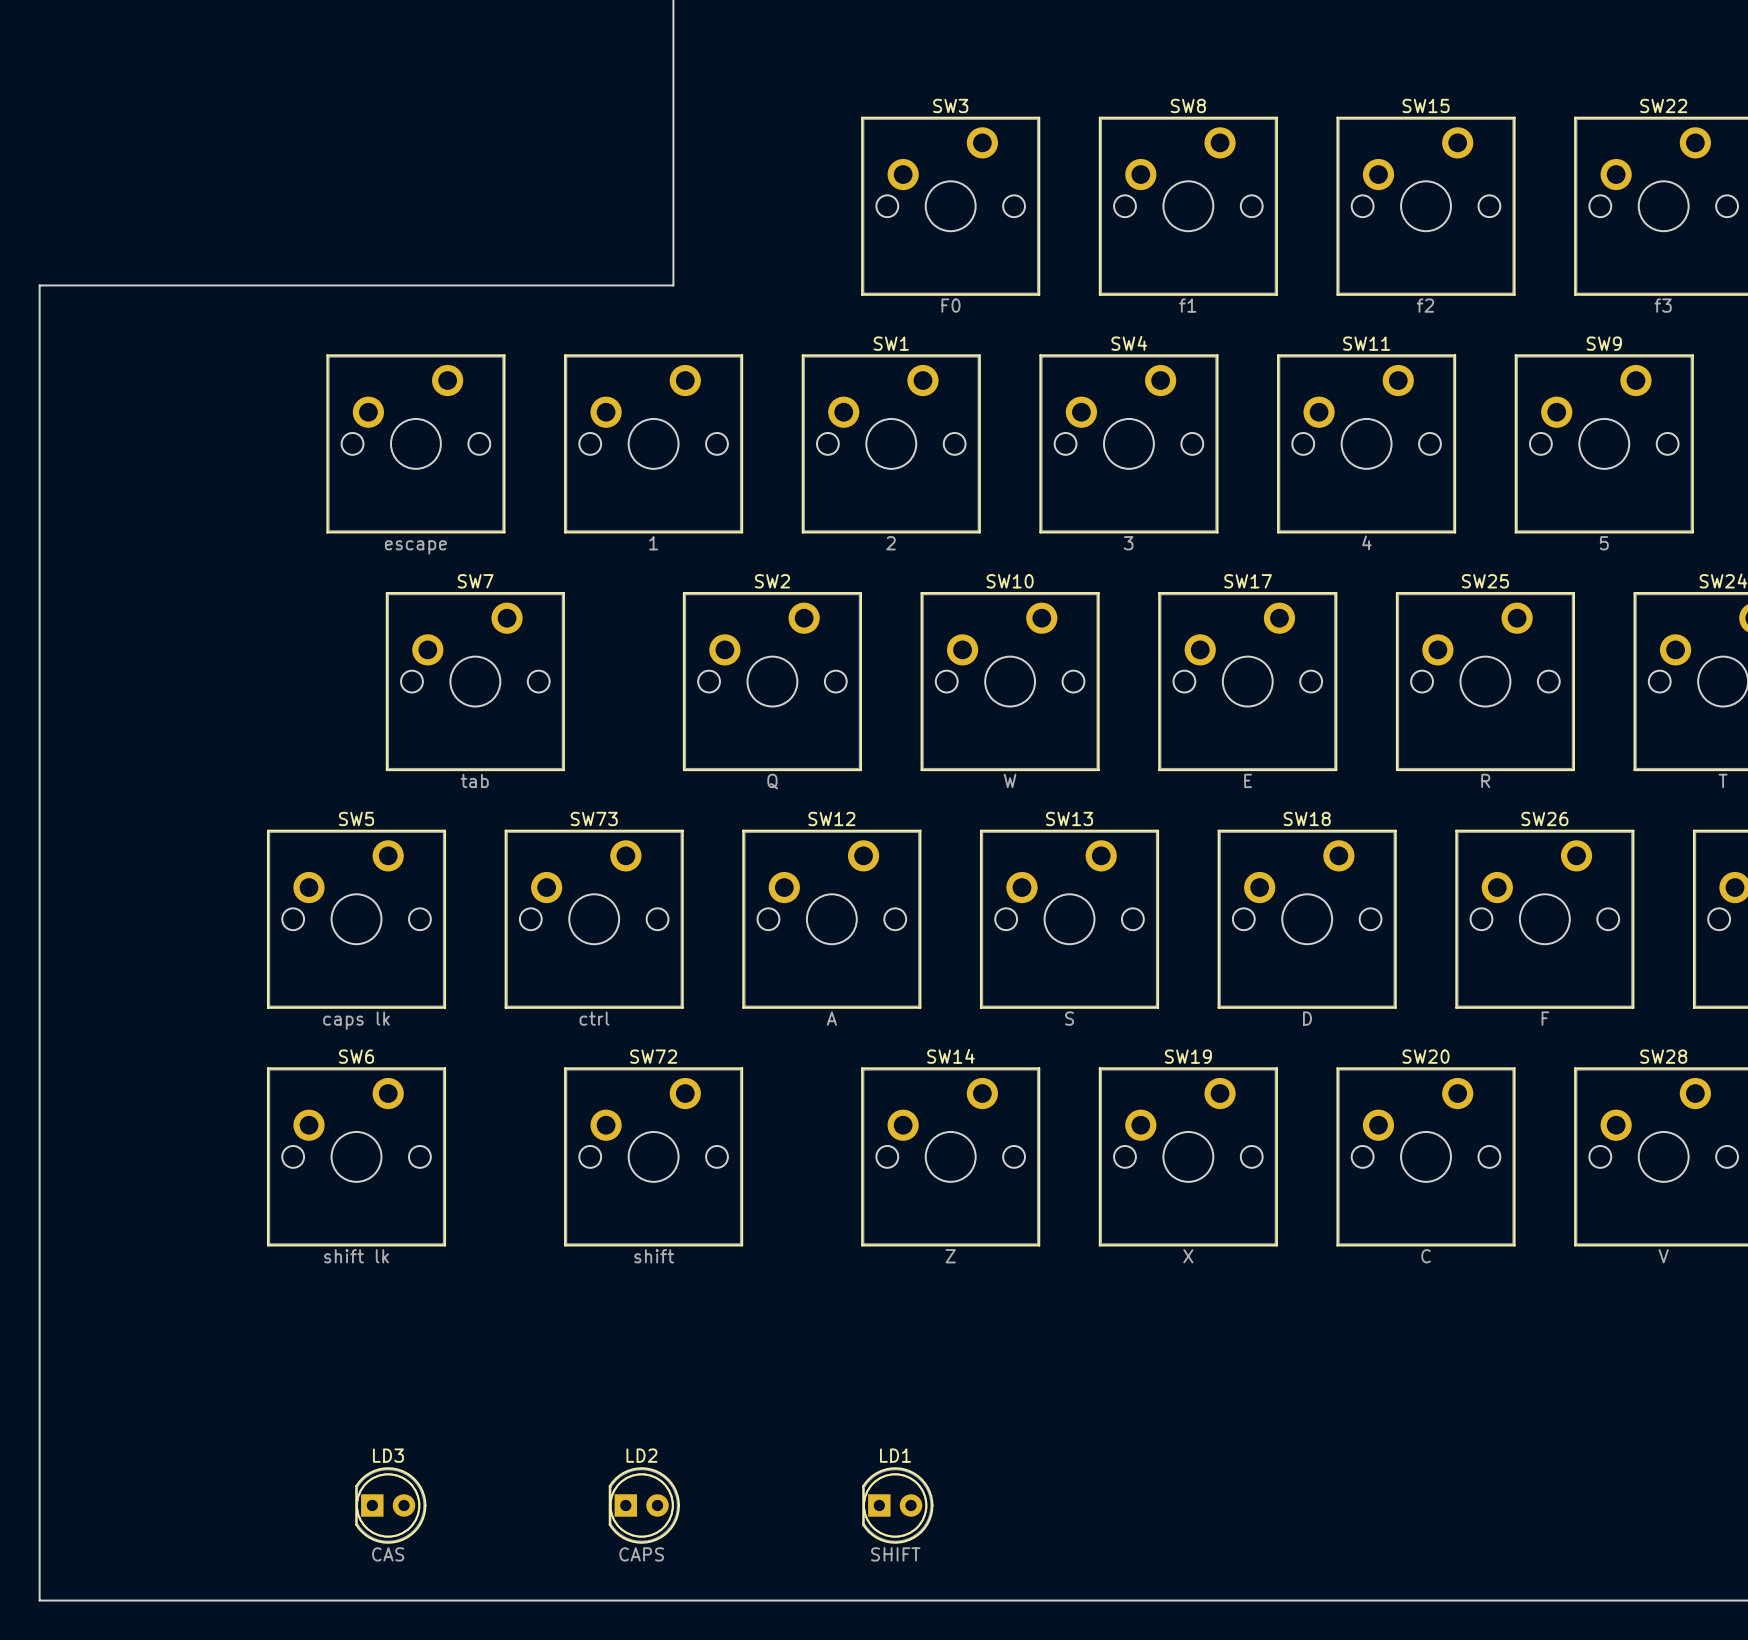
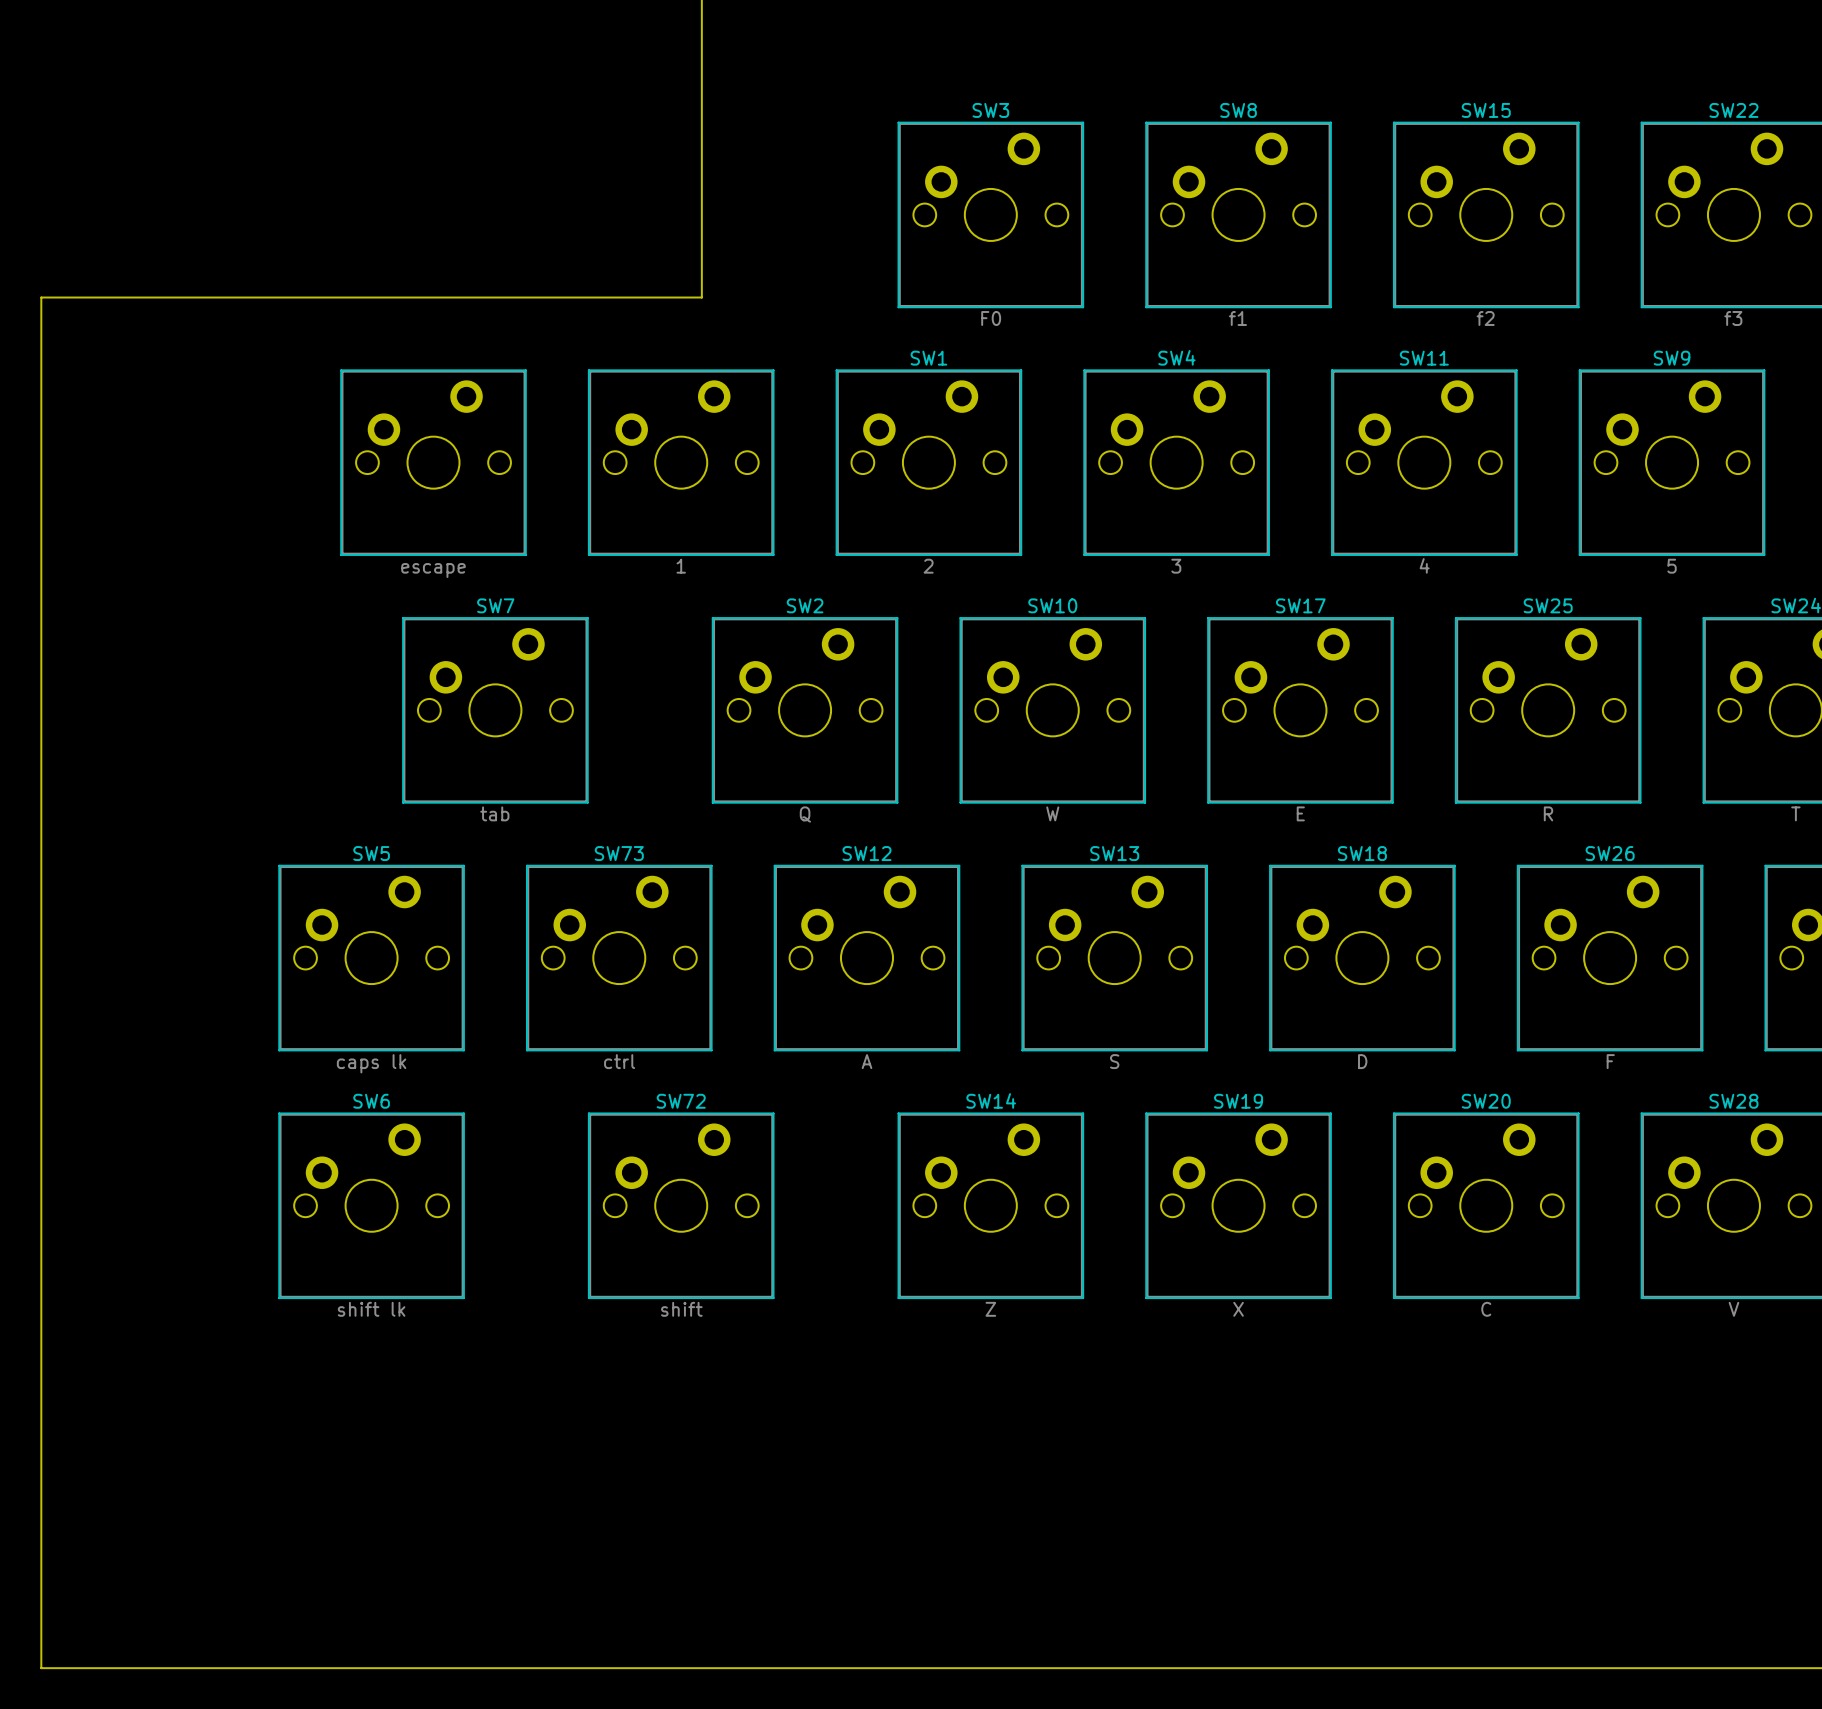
LD3: CAS (390, 1505) -> none
LD2: CAPS (644, 1505) -> none
LD1: SHIFT (897, 1505) -> none

